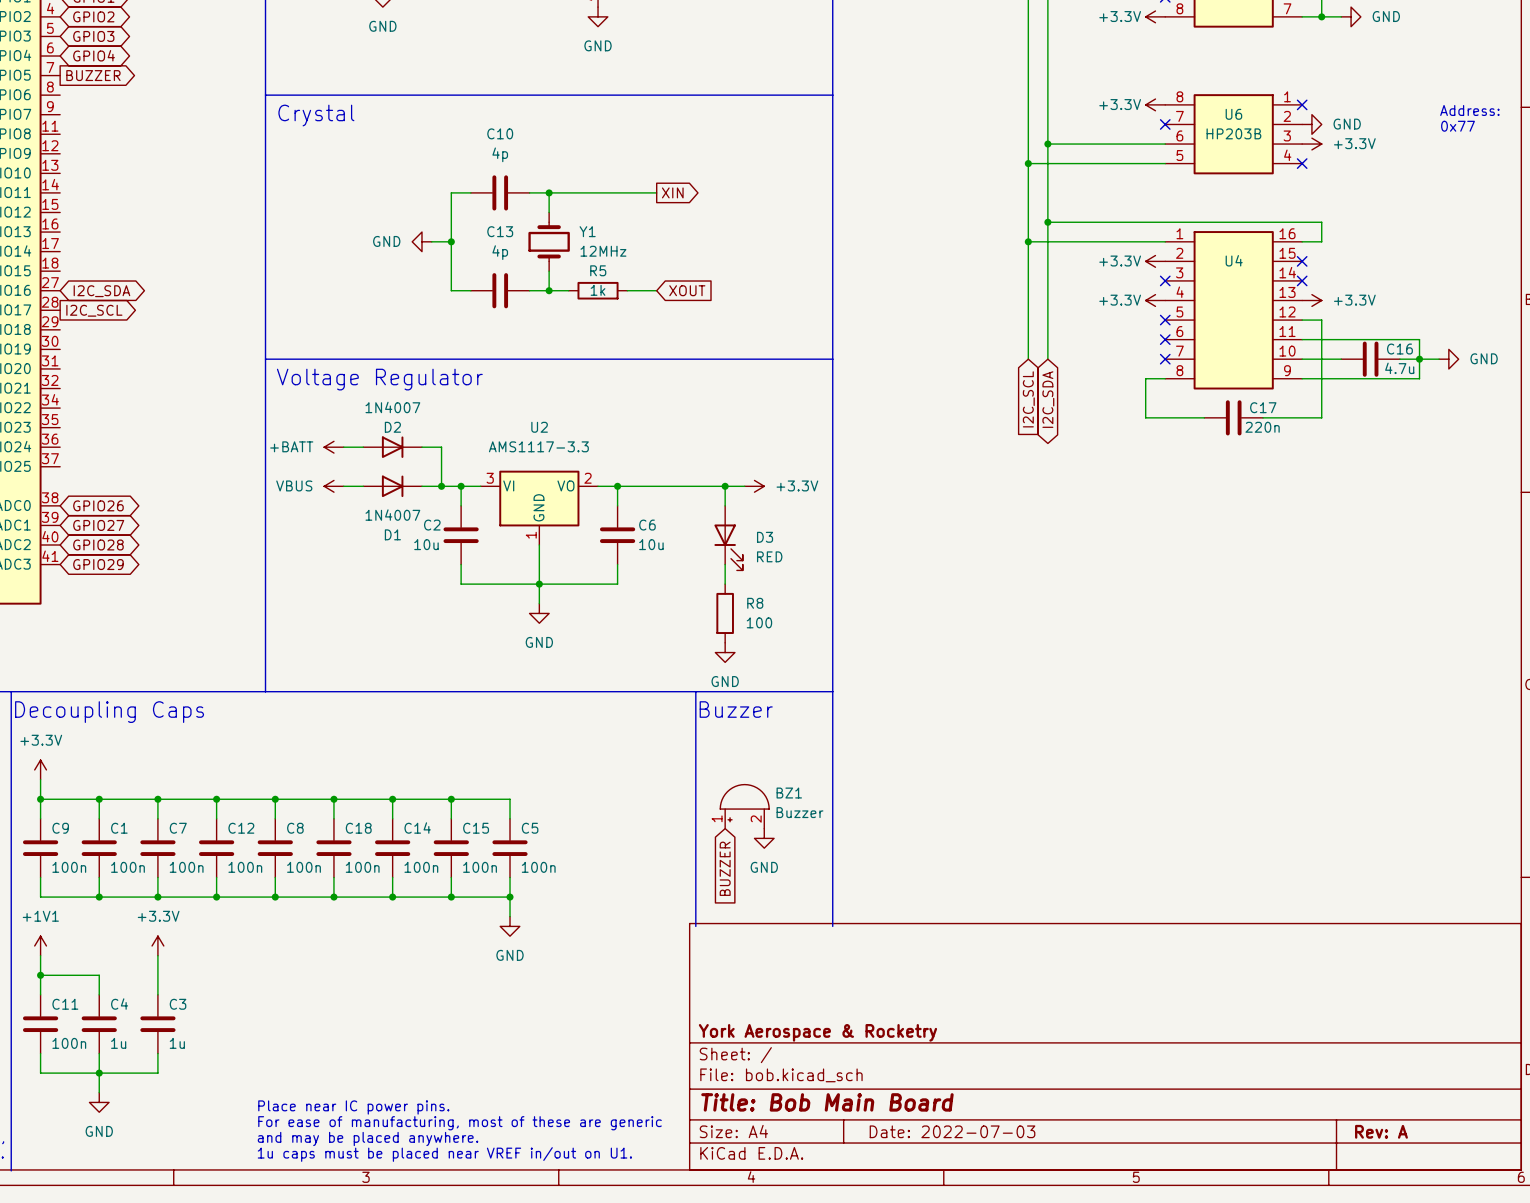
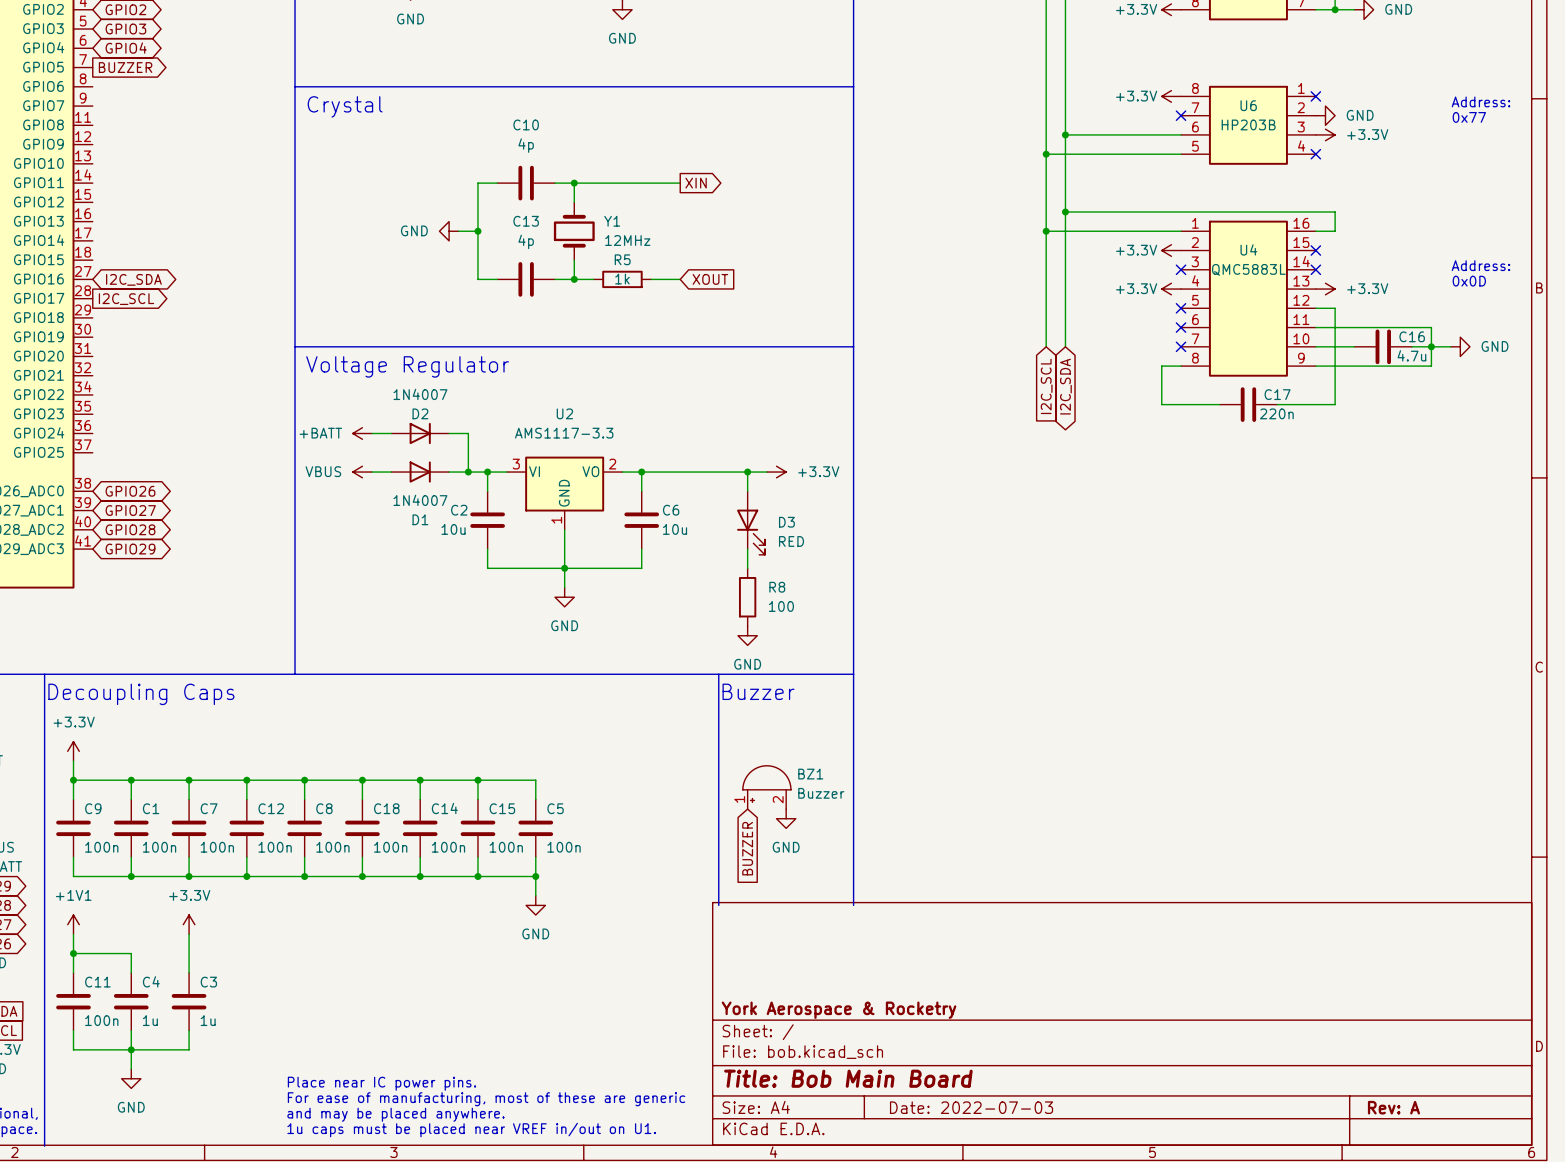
text: none -> Address: (1481, 265)
U4 value: none -> QMC5883L (1248, 269)
text: none -> 0x0D (1469, 281)

